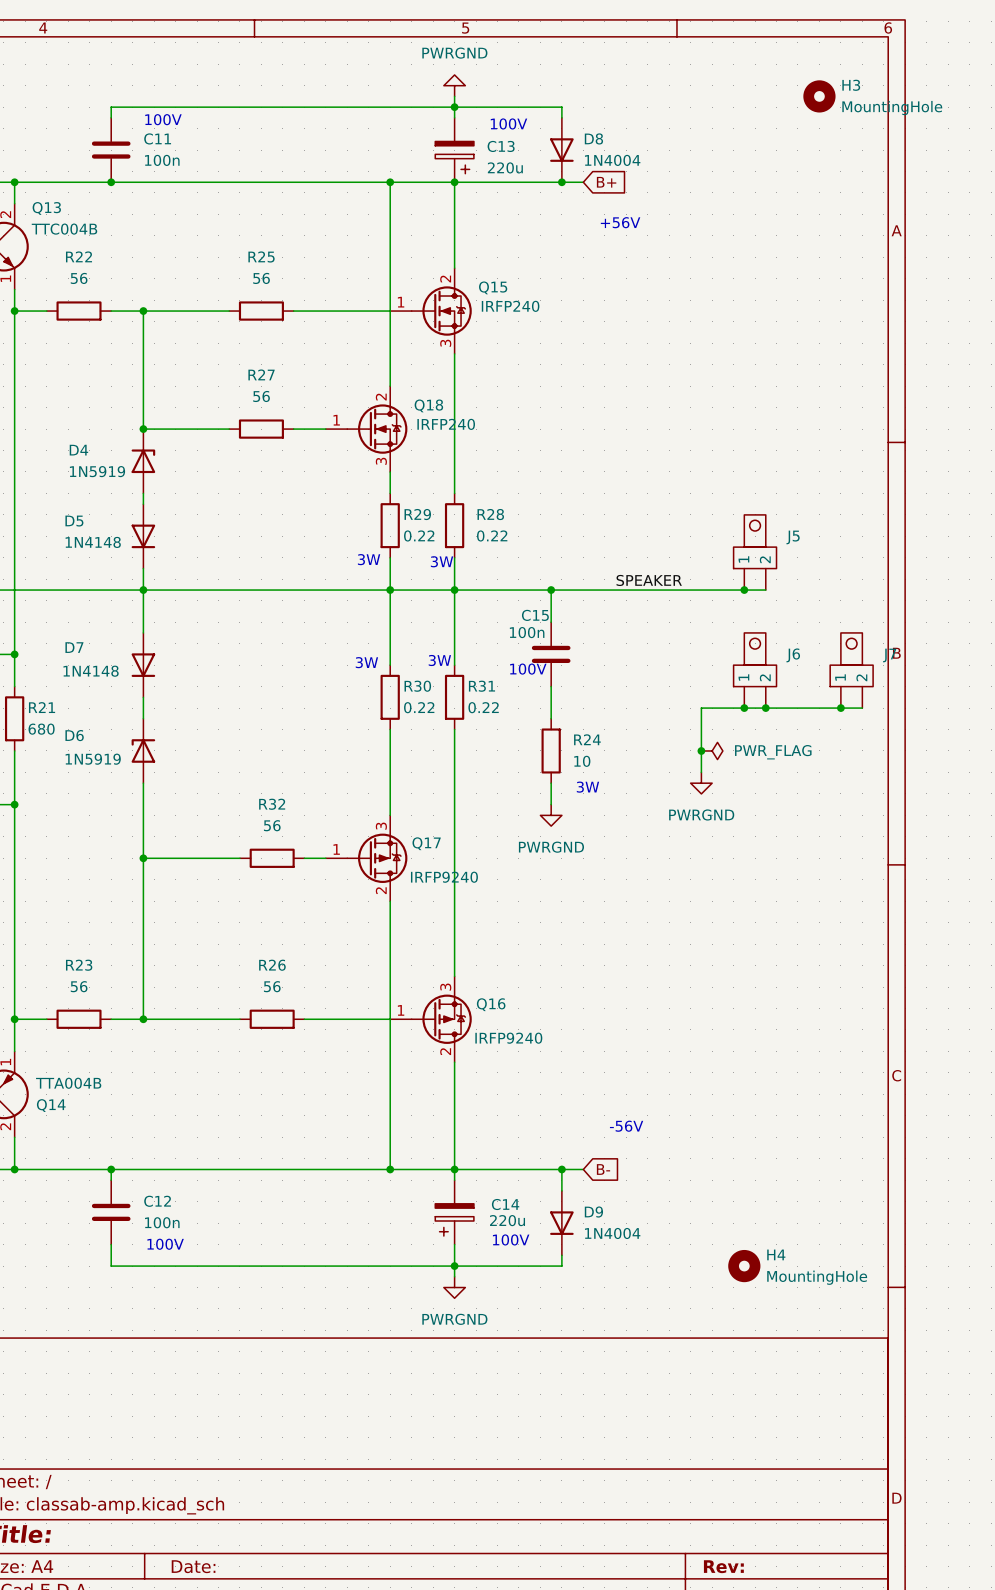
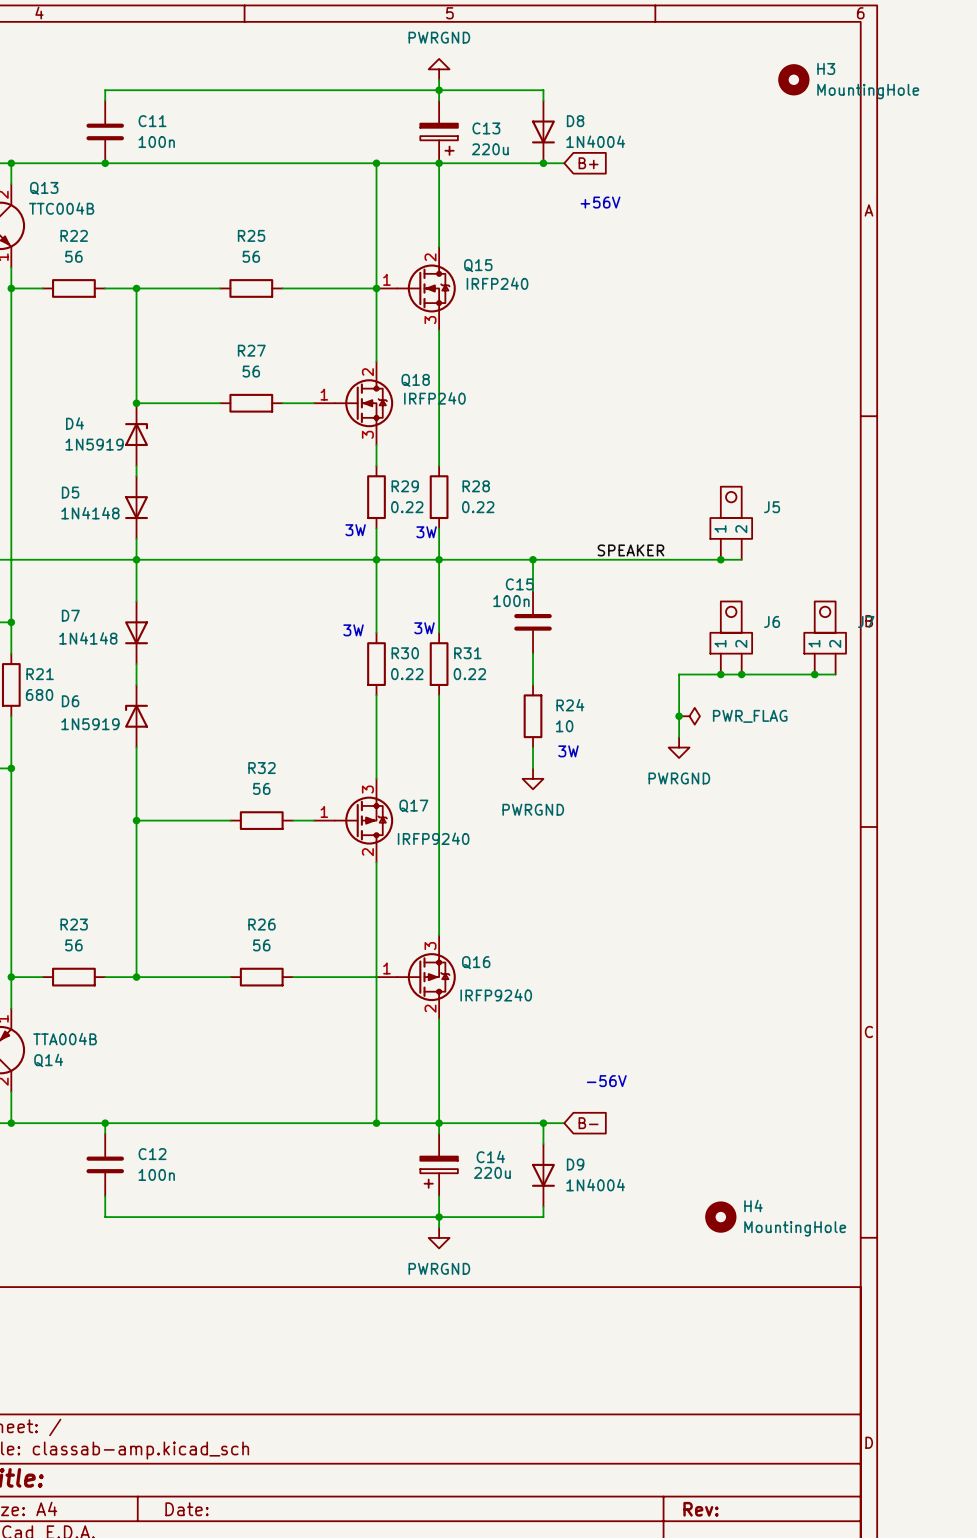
text: 100V (163, 119) -> none
text: 100V (508, 123) -> none
junction: none -> (376, 288)
text: 100V (528, 669) -> none
text: 100V (511, 1239) -> none
text: 100V (165, 1244) -> none

